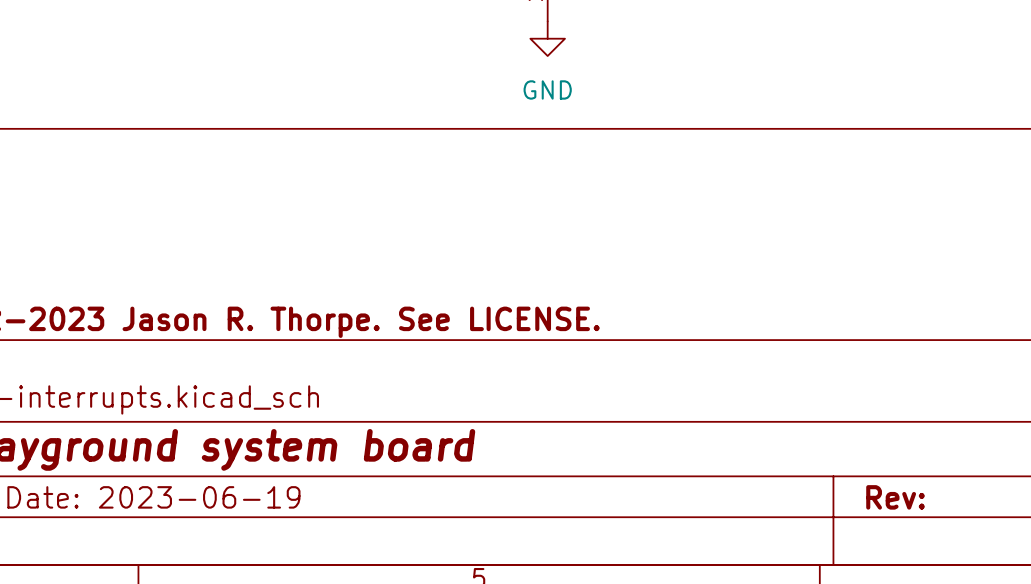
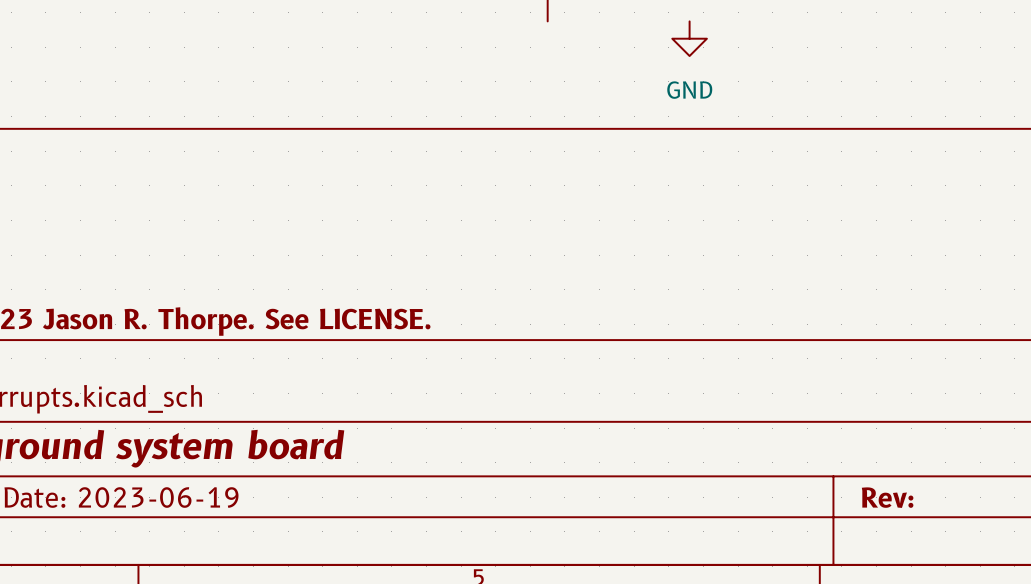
power symbol position: GND (547, 38) -> GND (689, 38)

